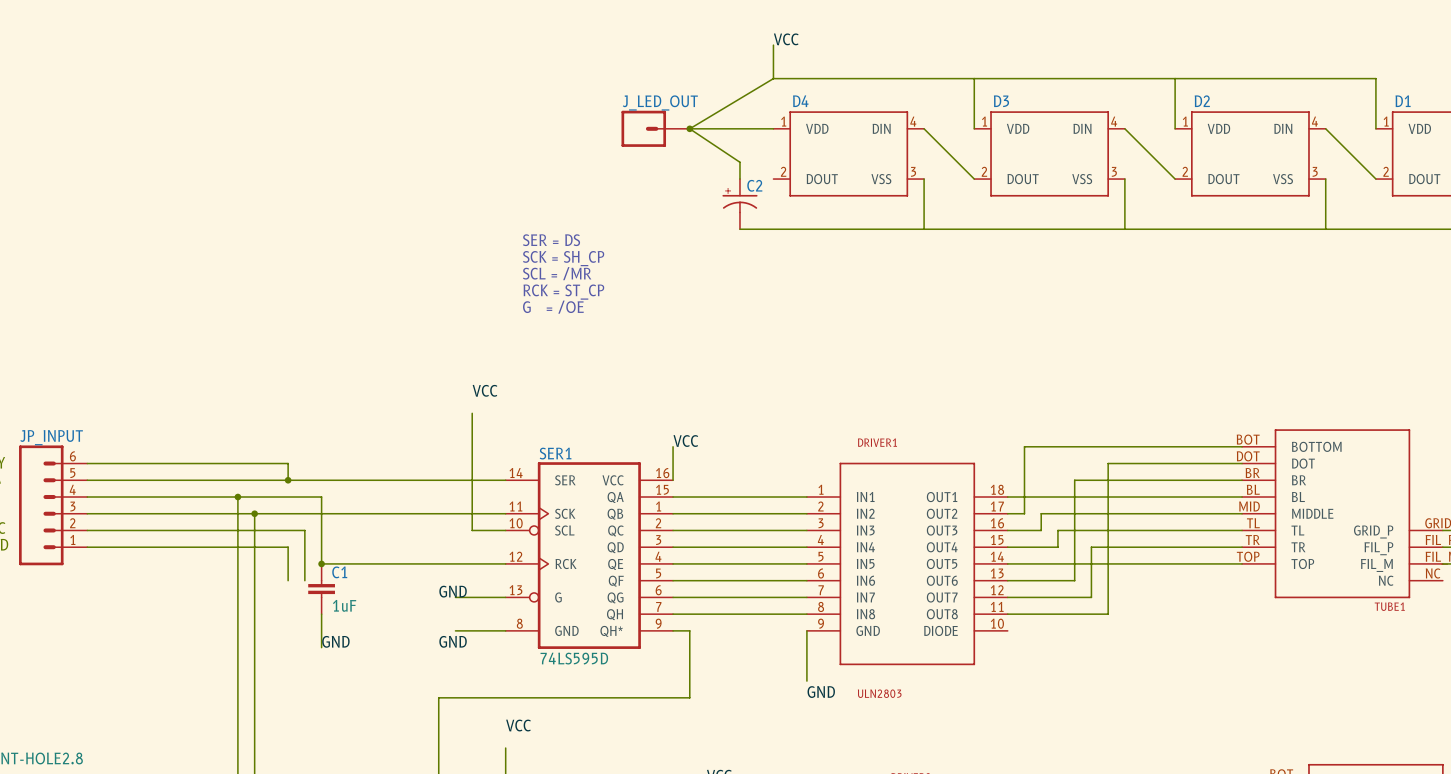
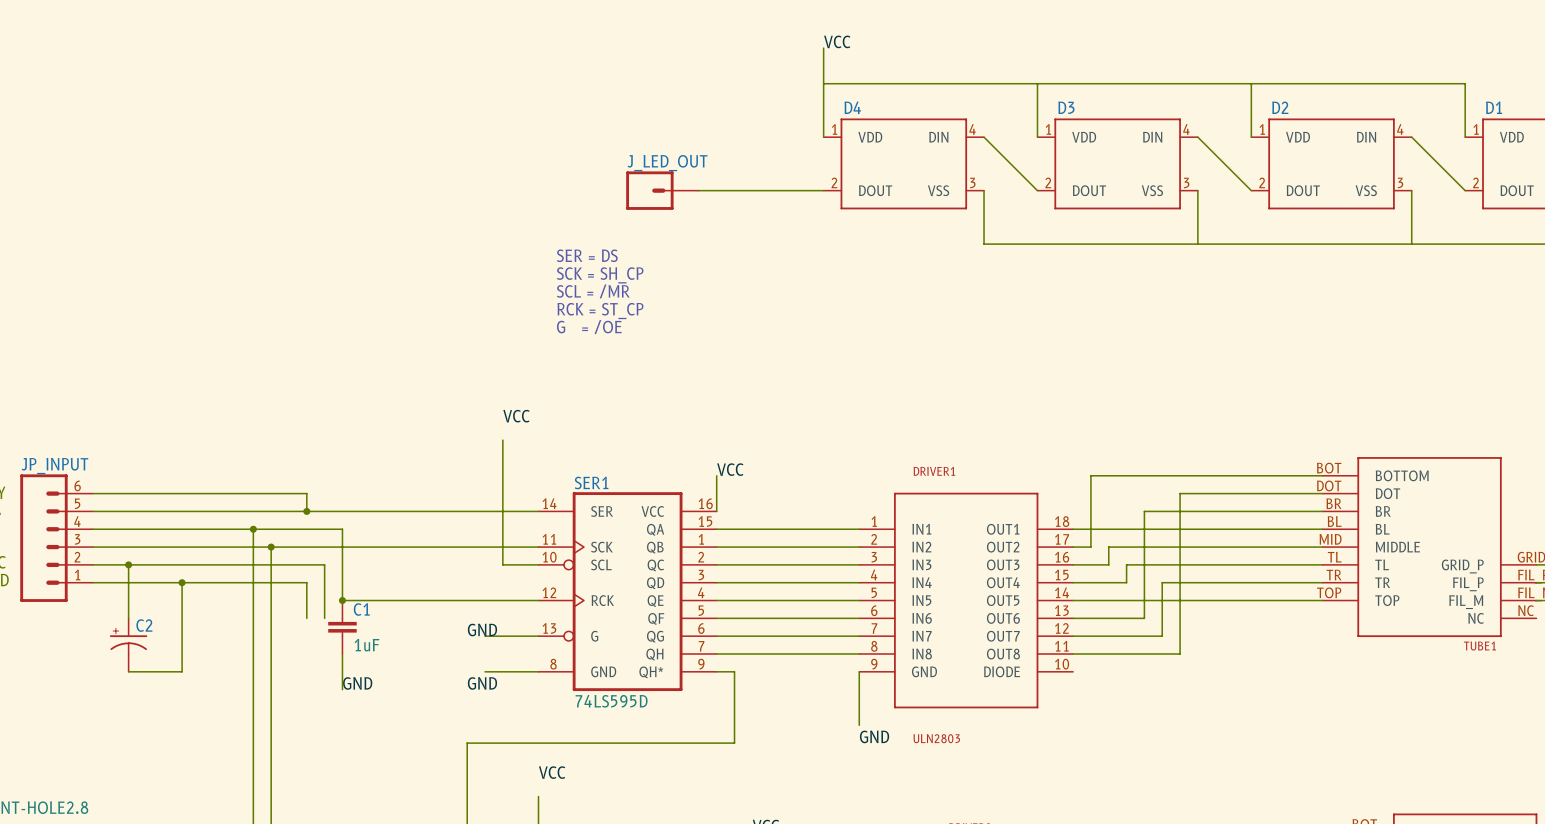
wire: (773, 78) (689, 128) -> (823, 83) (823, 137)
J_LED_OUT position: (655, 128) -> (662, 190)
wire: (689, 128) (739, 162) (739, 179) -> none
wire: (689, 128) (773, 128) -> none
junction: (689, 128) -> none
wire: none -> (698, 190) (823, 190)
C2 position: (739, 204) -> (128, 645)
wire: (739, 229) (924, 229) -> none
wire: none -> (128, 564) (128, 618)
junction: none -> (128, 564)
wire: none -> (182, 582) (182, 671) (128, 671)
junction: none -> (182, 582)

